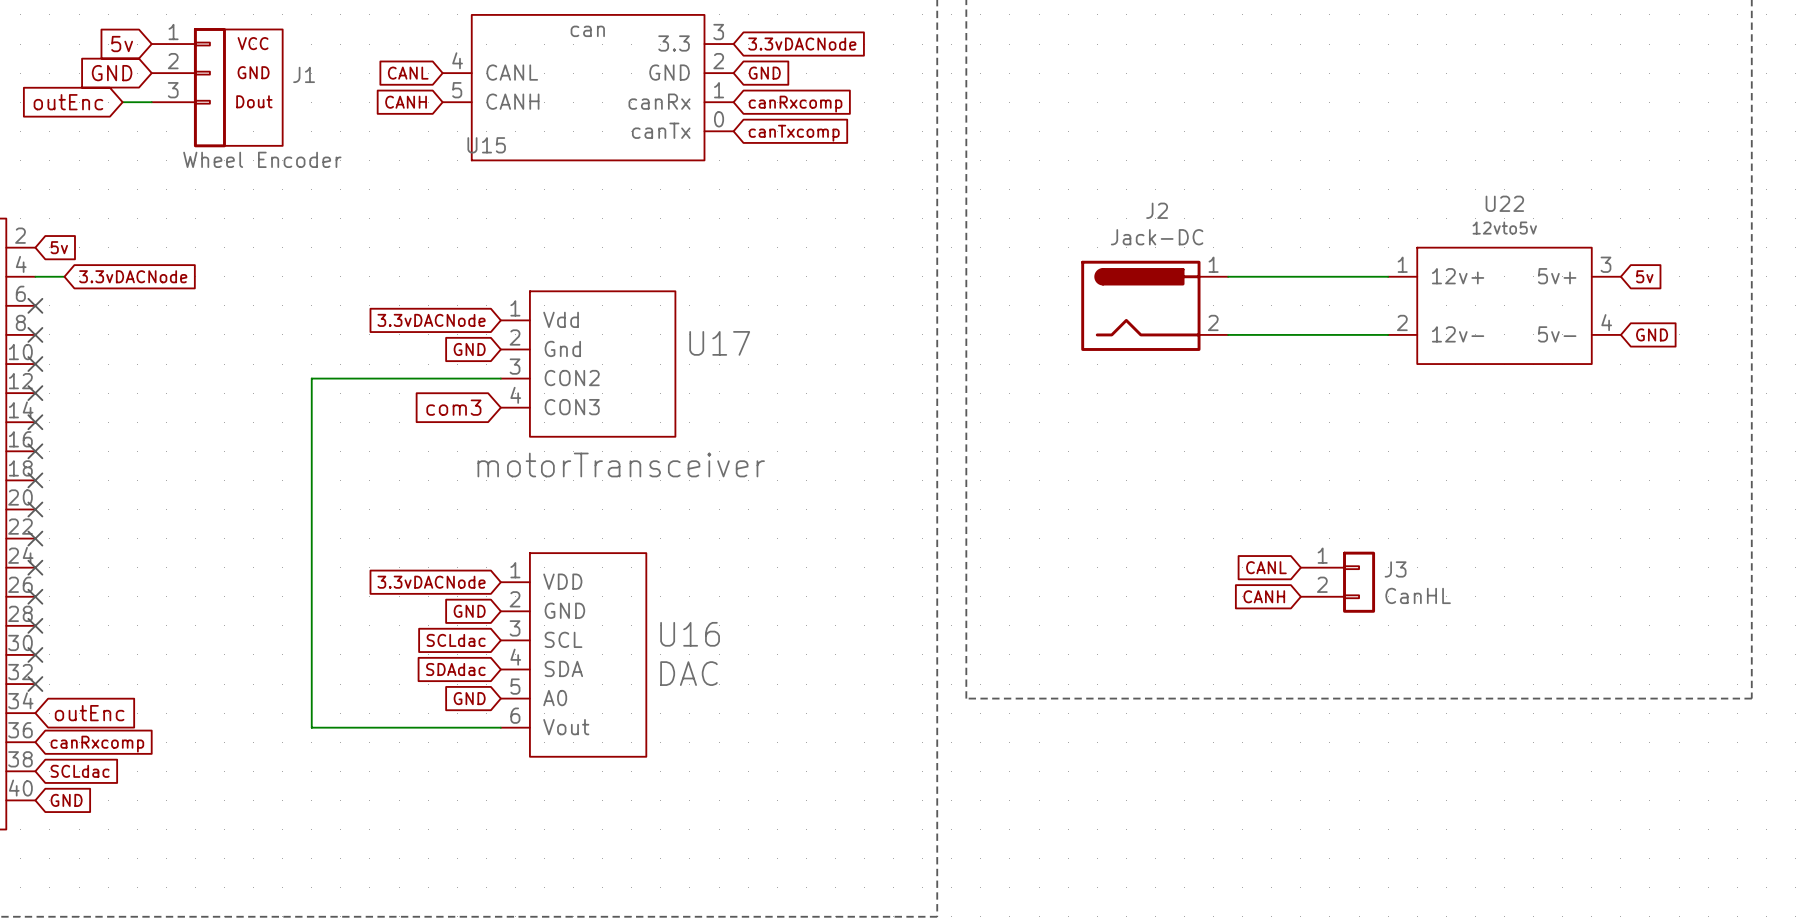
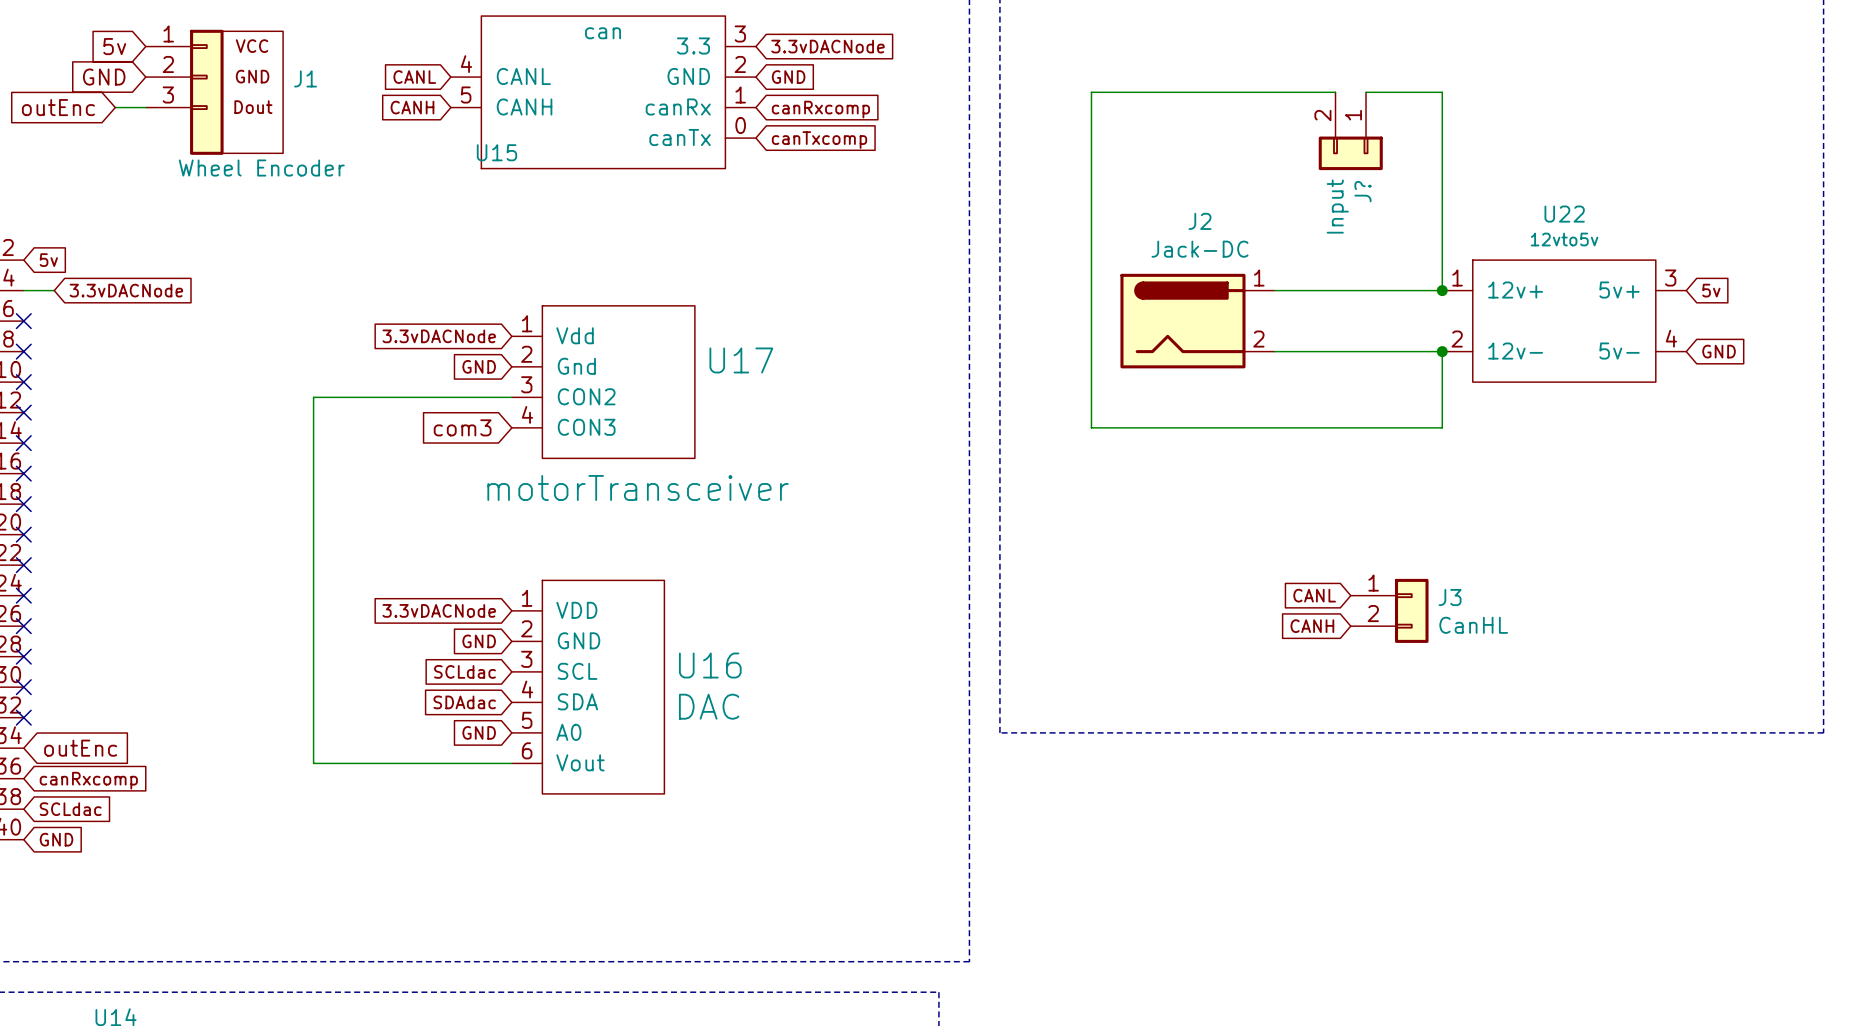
wire: none -> (1335, 92) (1091, 92) (1091, 427) (1442, 427) (1442, 351)
wire: none -> (1366, 92) (1442, 92) (1442, 290)
J?: none -> Input (1350, 131)
junction: none -> (1442, 290)
junction: none -> (1442, 351)

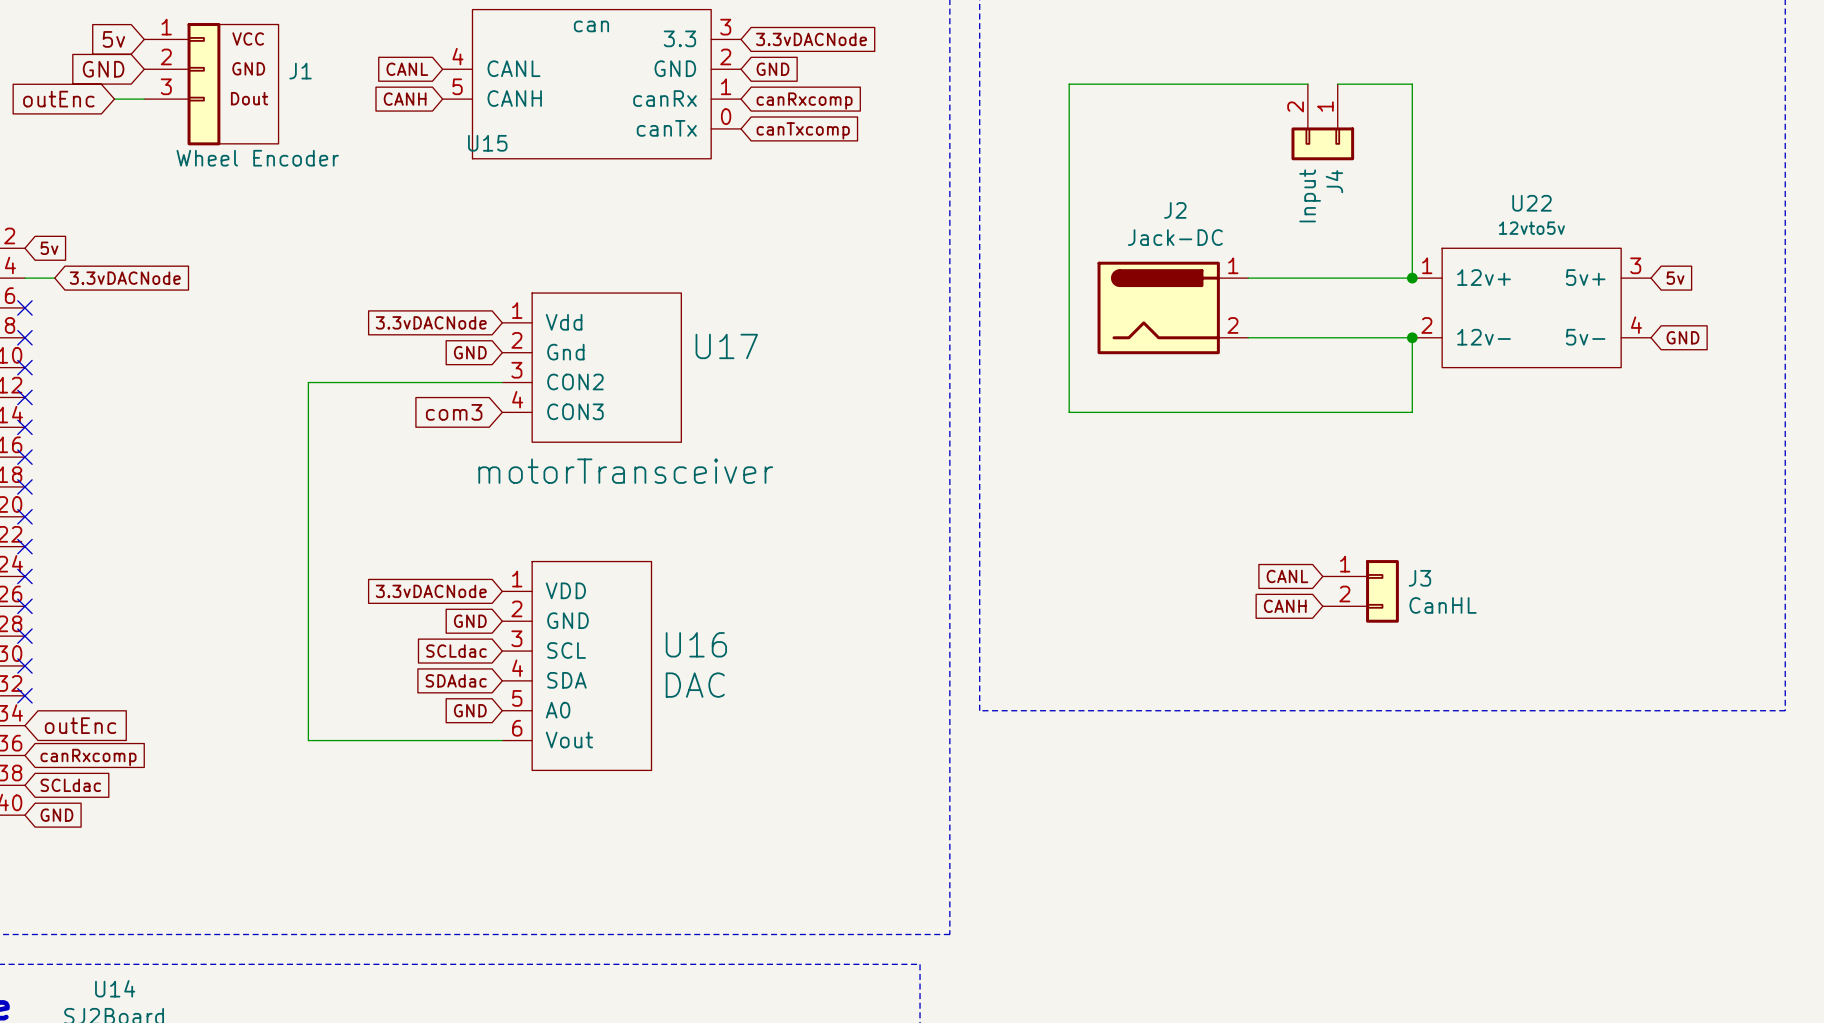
J? name: J? (1363, 191) -> J4 (1334, 181)

